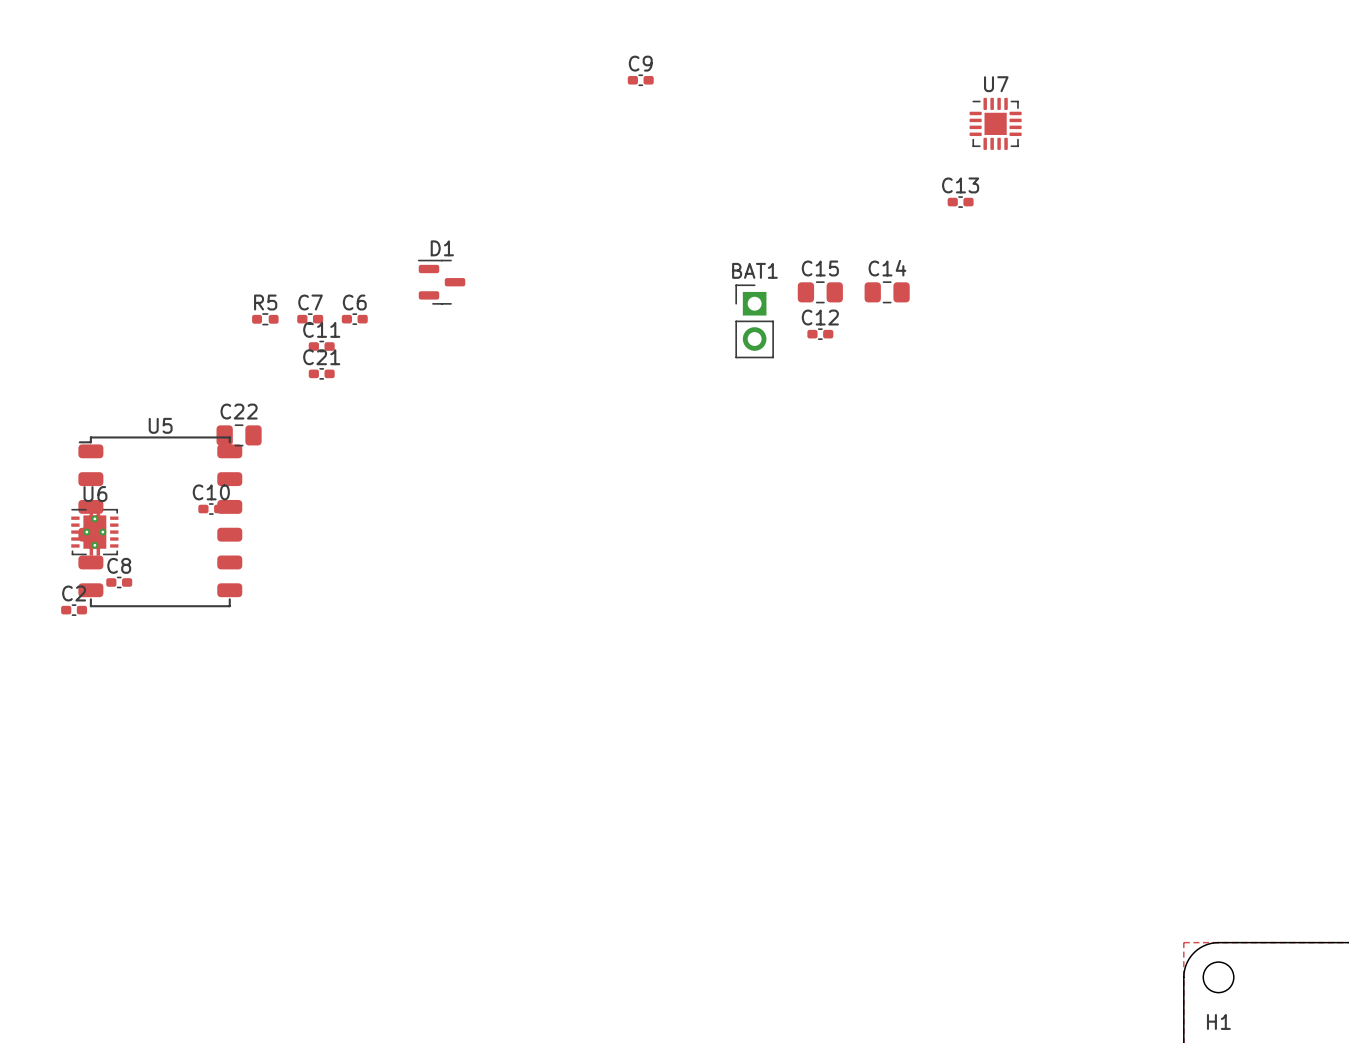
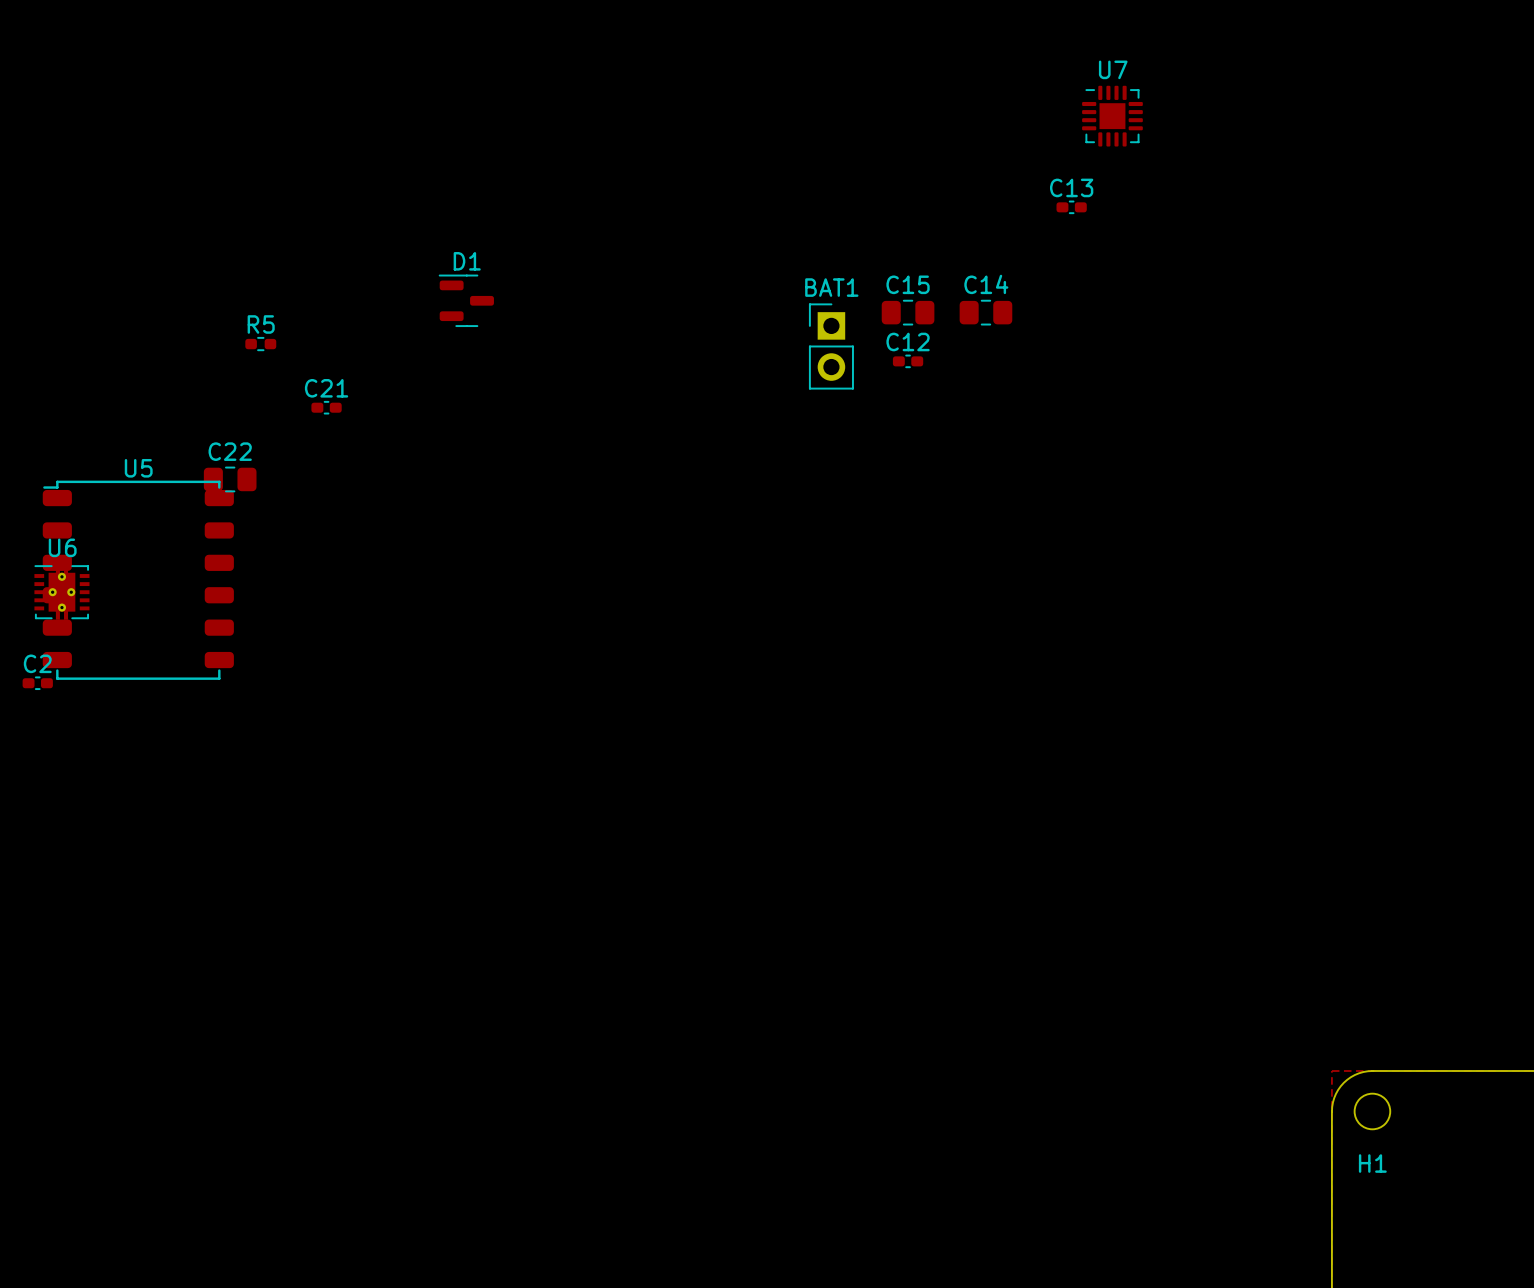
C9: (640, 80) -> none
C7: (310, 319) -> none
C6: (354, 319) -> none
C11: (321, 346) -> none
C10: (211, 509) -> none
C8: (119, 582) -> none

